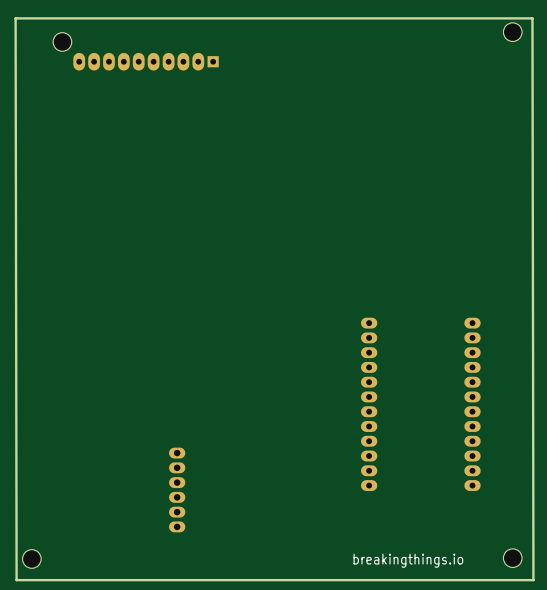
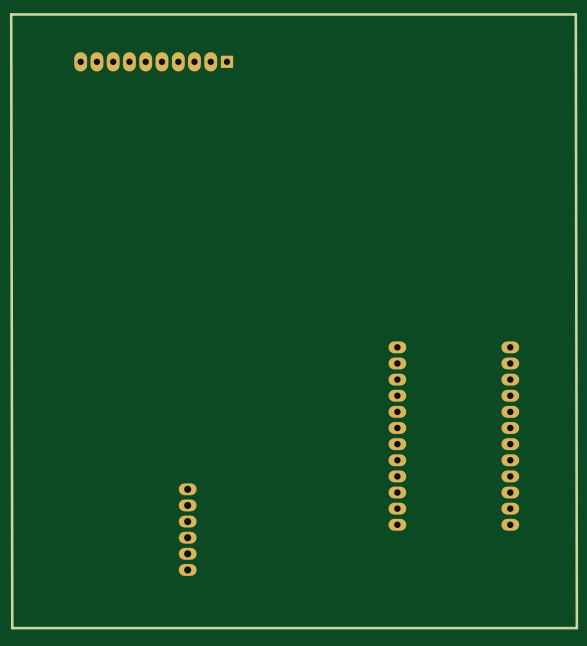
hole: (512, 32) -> none
hole: (62, 41) -> none
hole: (31, 558) -> none
hole: (512, 558) -> none
text: breakingthings.io (408, 560) -> none

